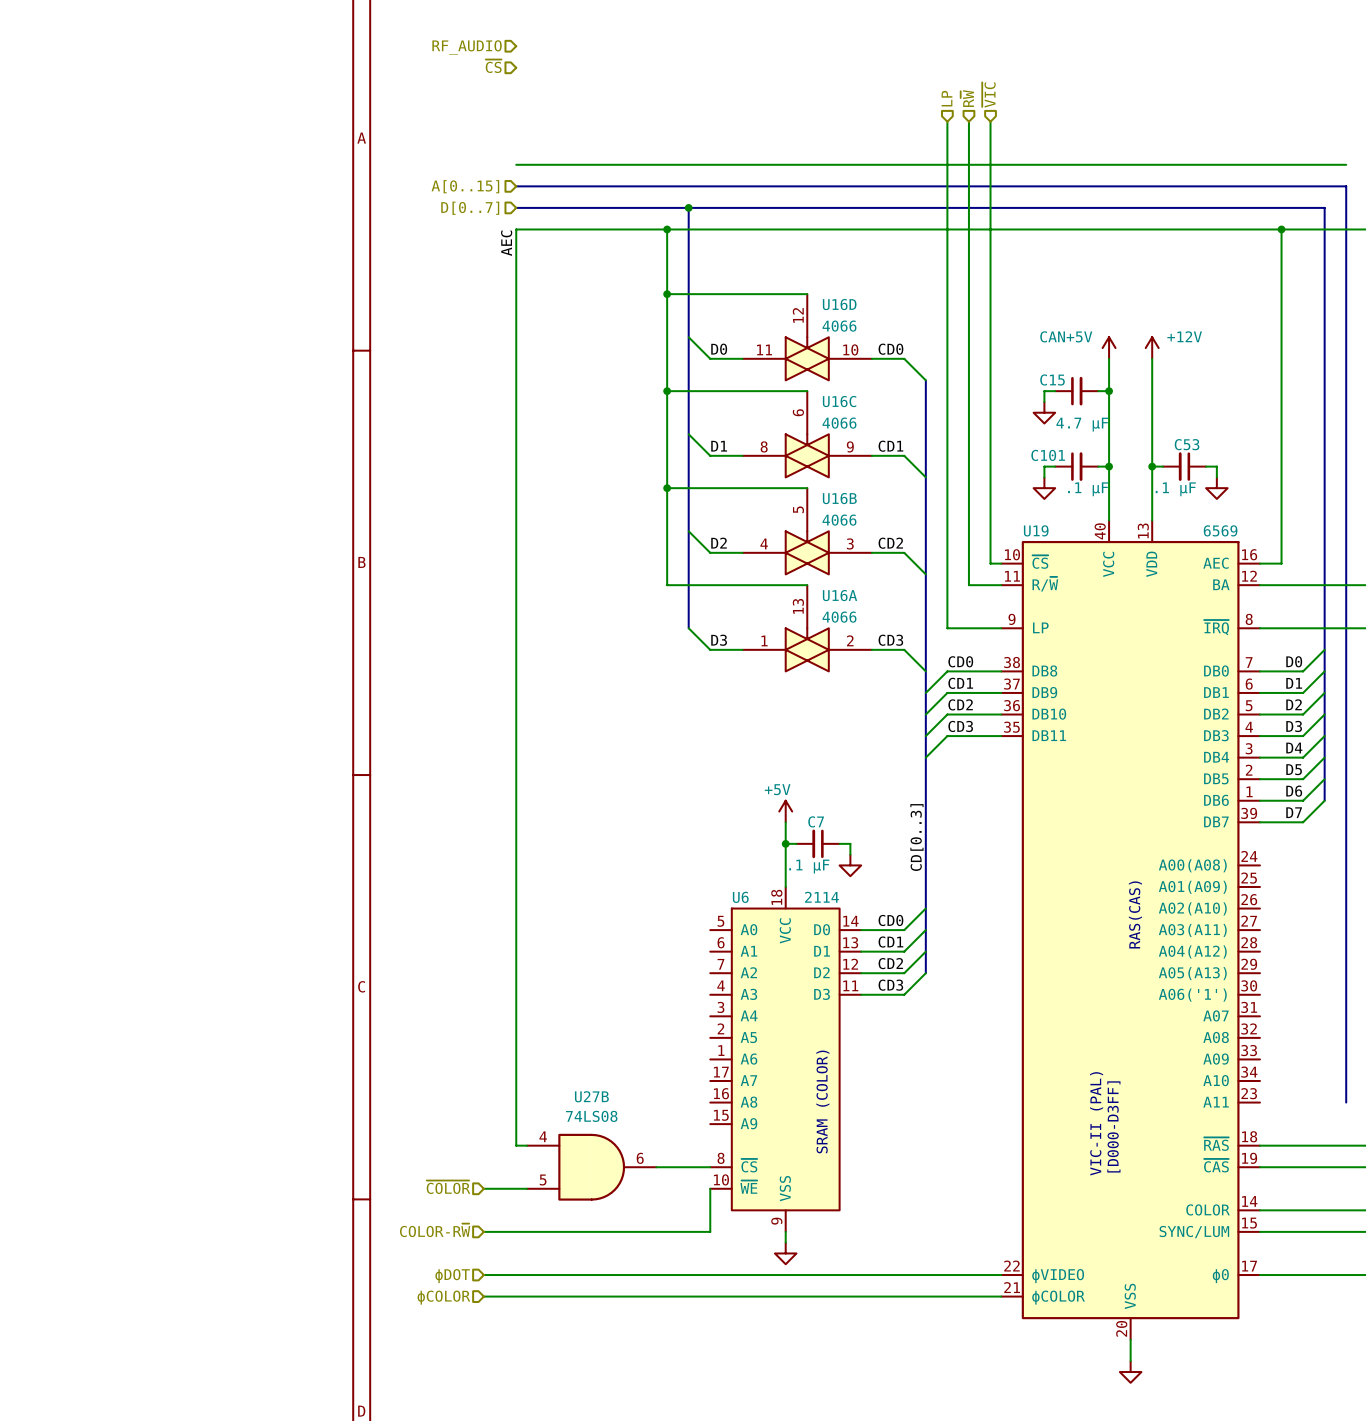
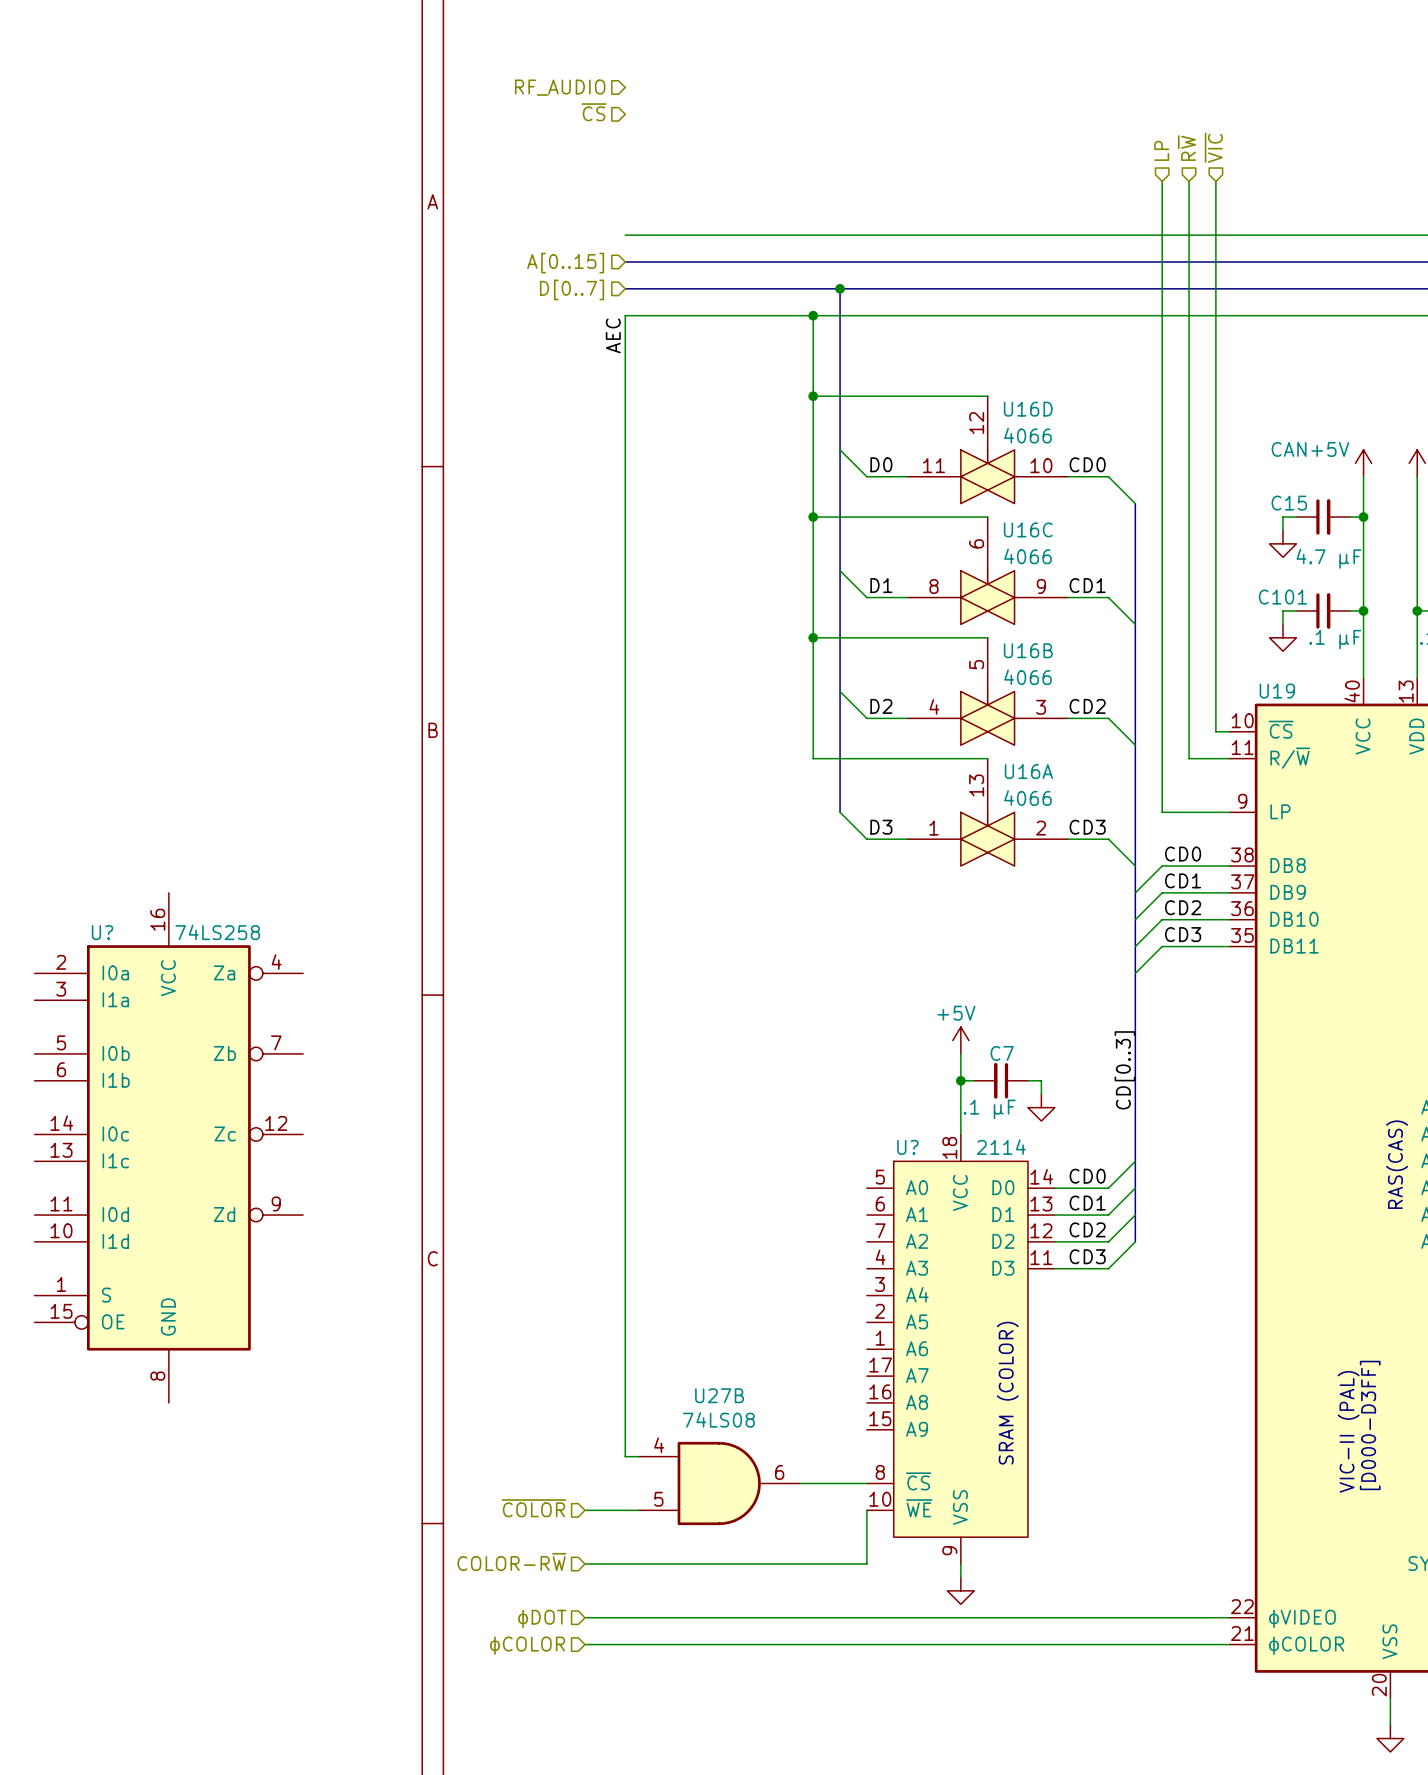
U?: none -> 74LS258 (168, 1147)
U6 name: U6 (740, 897) -> U? (907, 1147)

